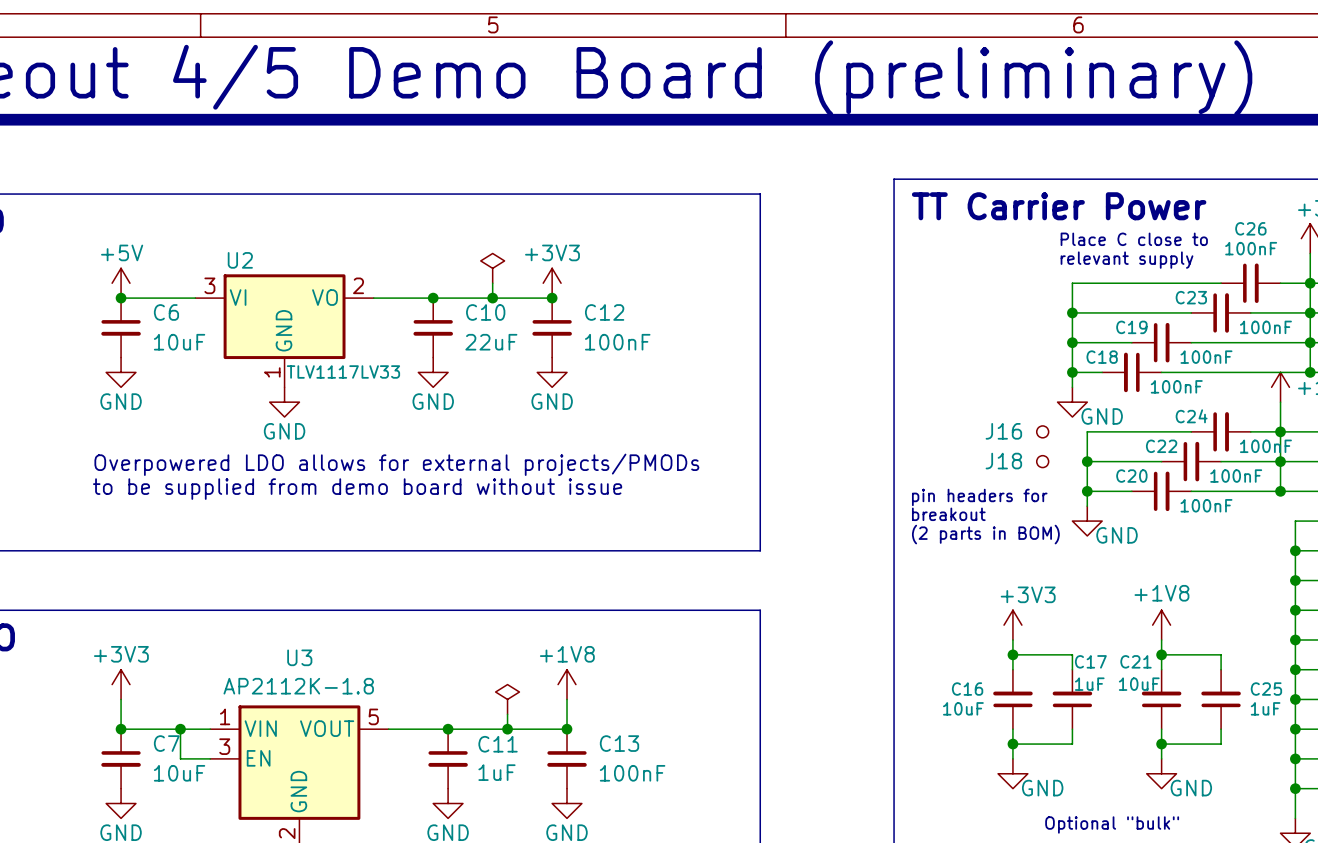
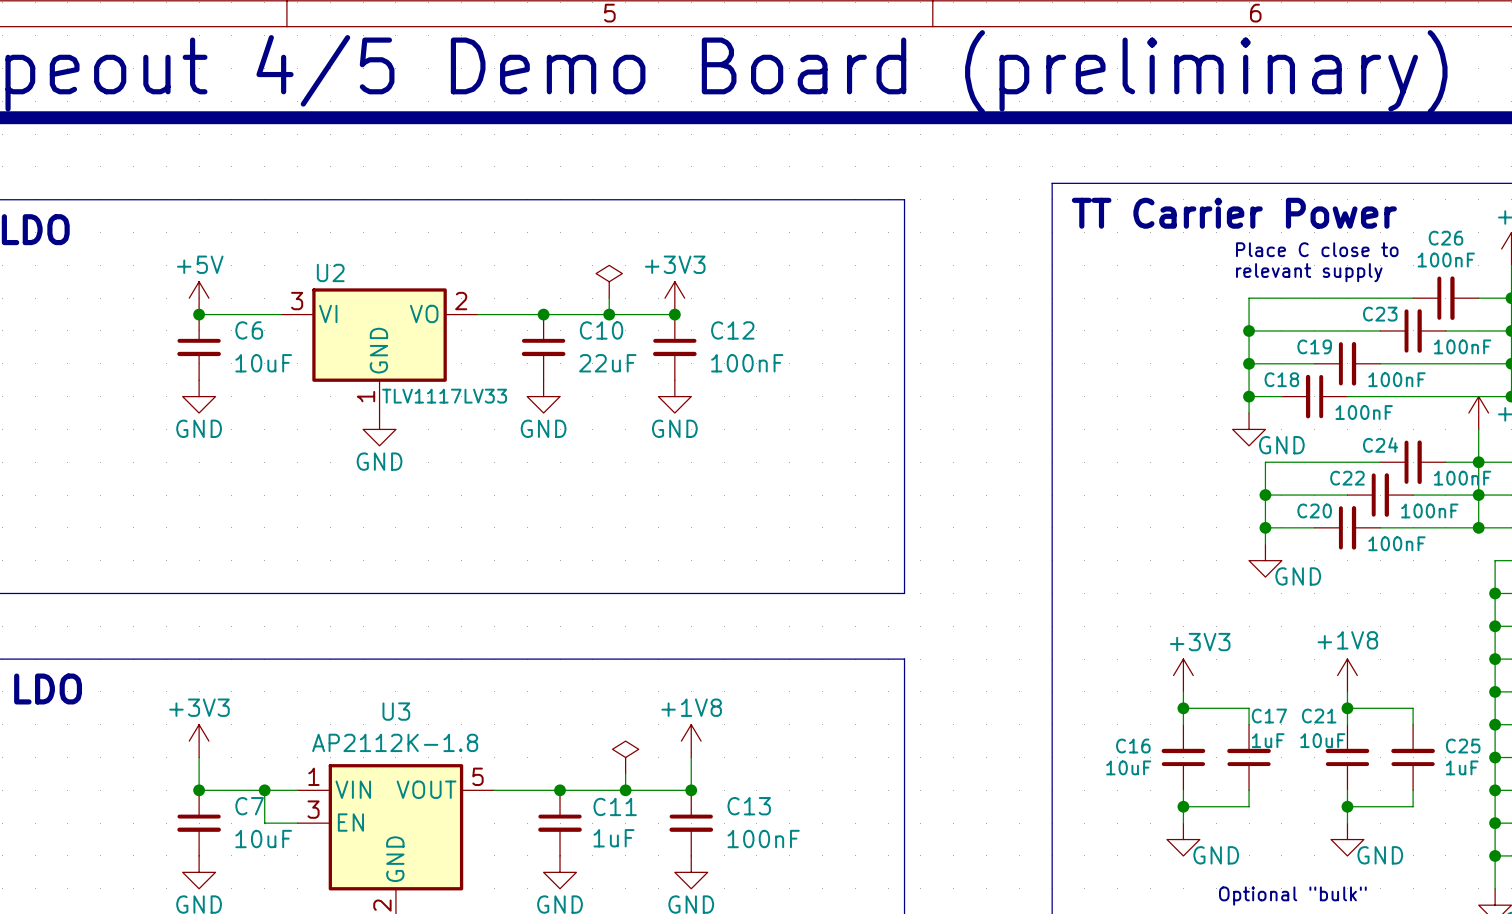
J16: (1042, 431) -> none
J18: (1042, 461) -> none
text: Overpowered LDO allows for external projects/PMODs (396, 464) -> none
text: to be supplied from demo board without issue (357, 489) -> none
text: pin headers for (979, 497) -> none
text: breakout (948, 514) -> none
text: (2 parts in BOM) (985, 534) -> none

